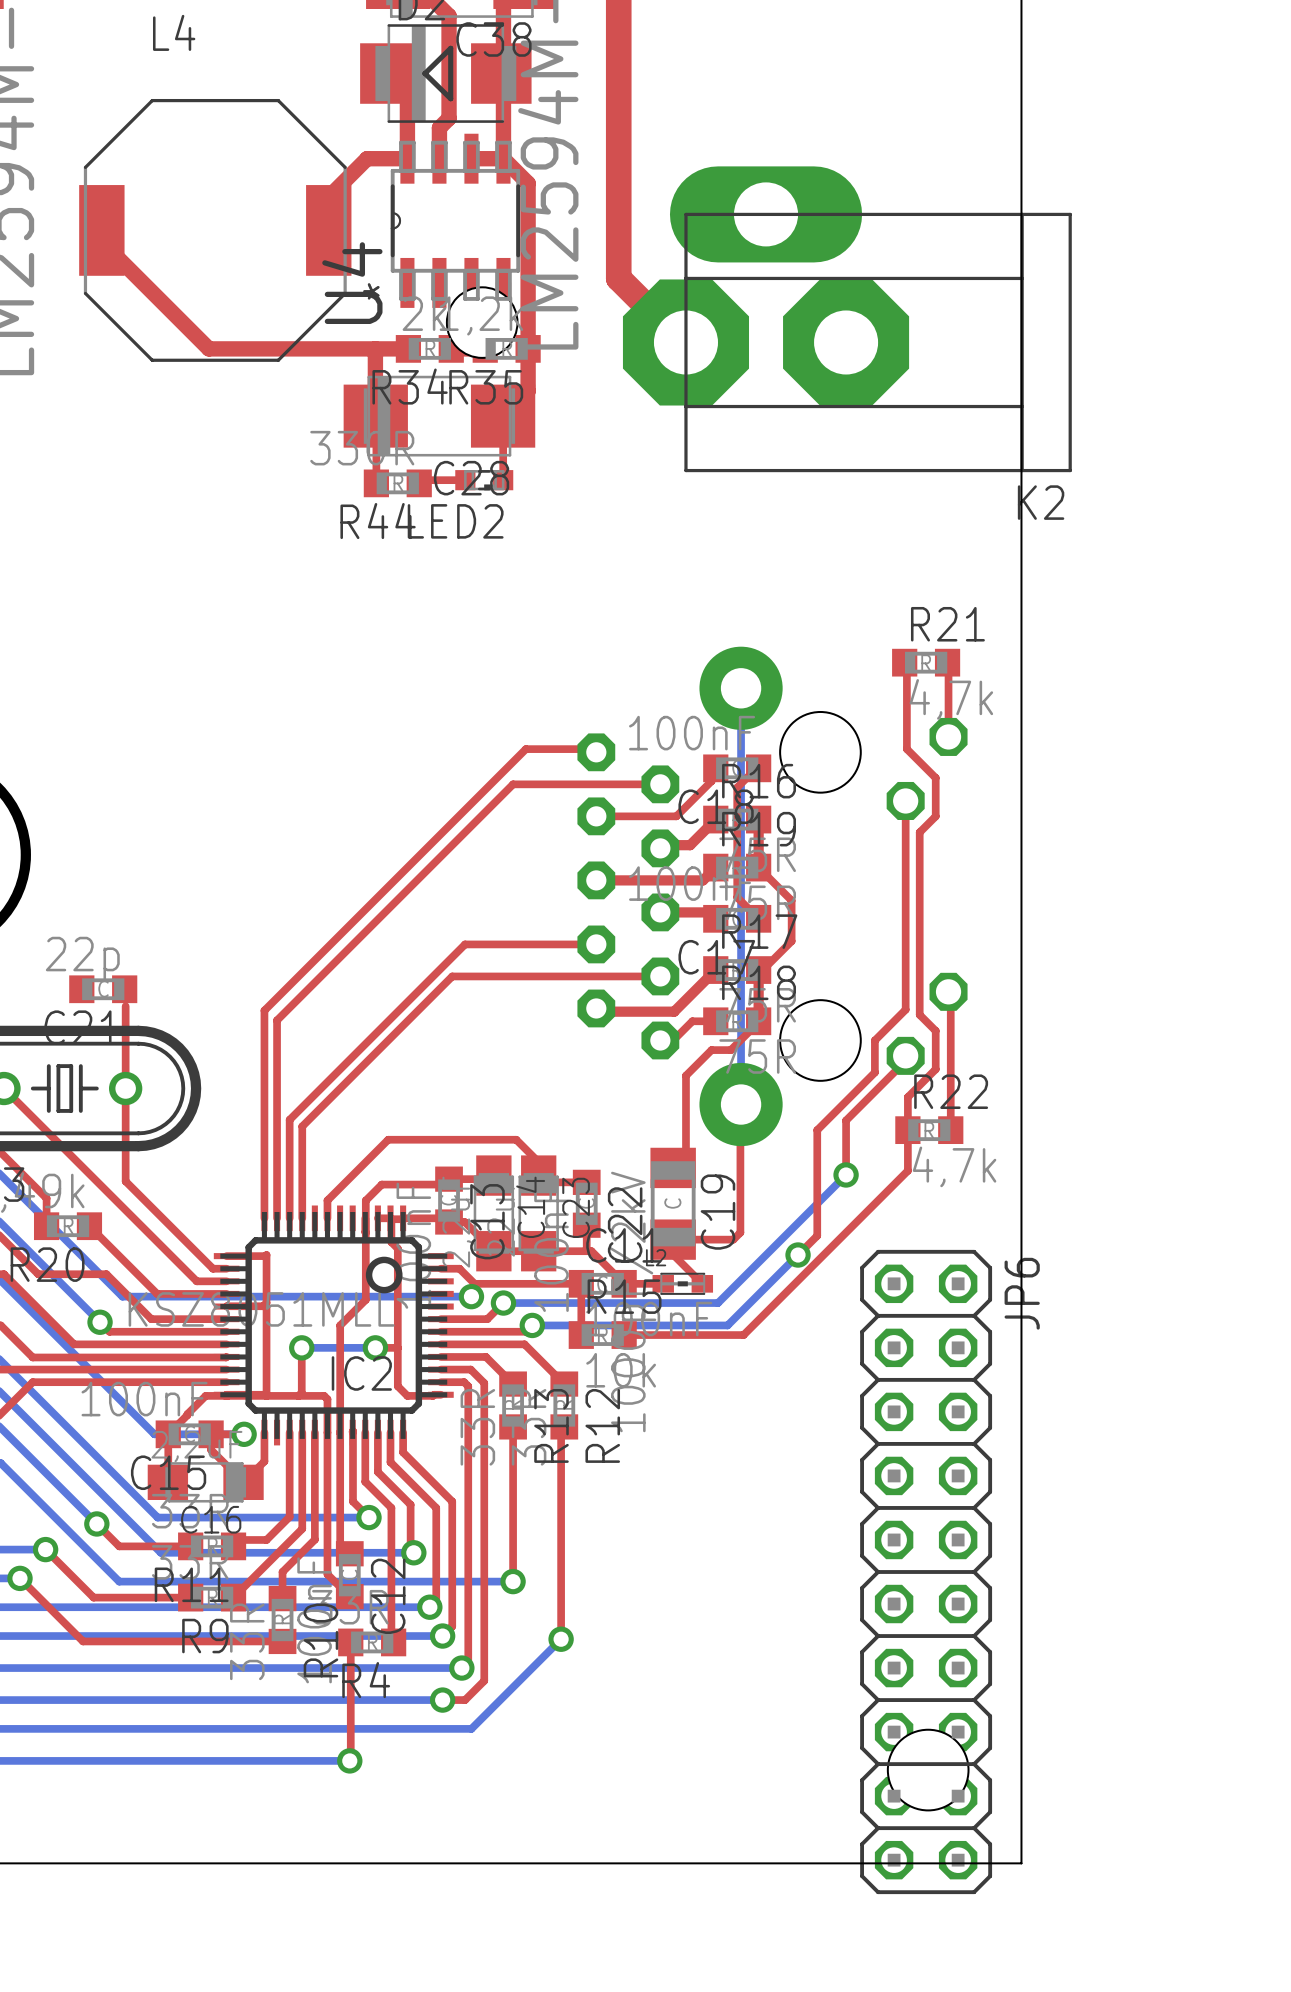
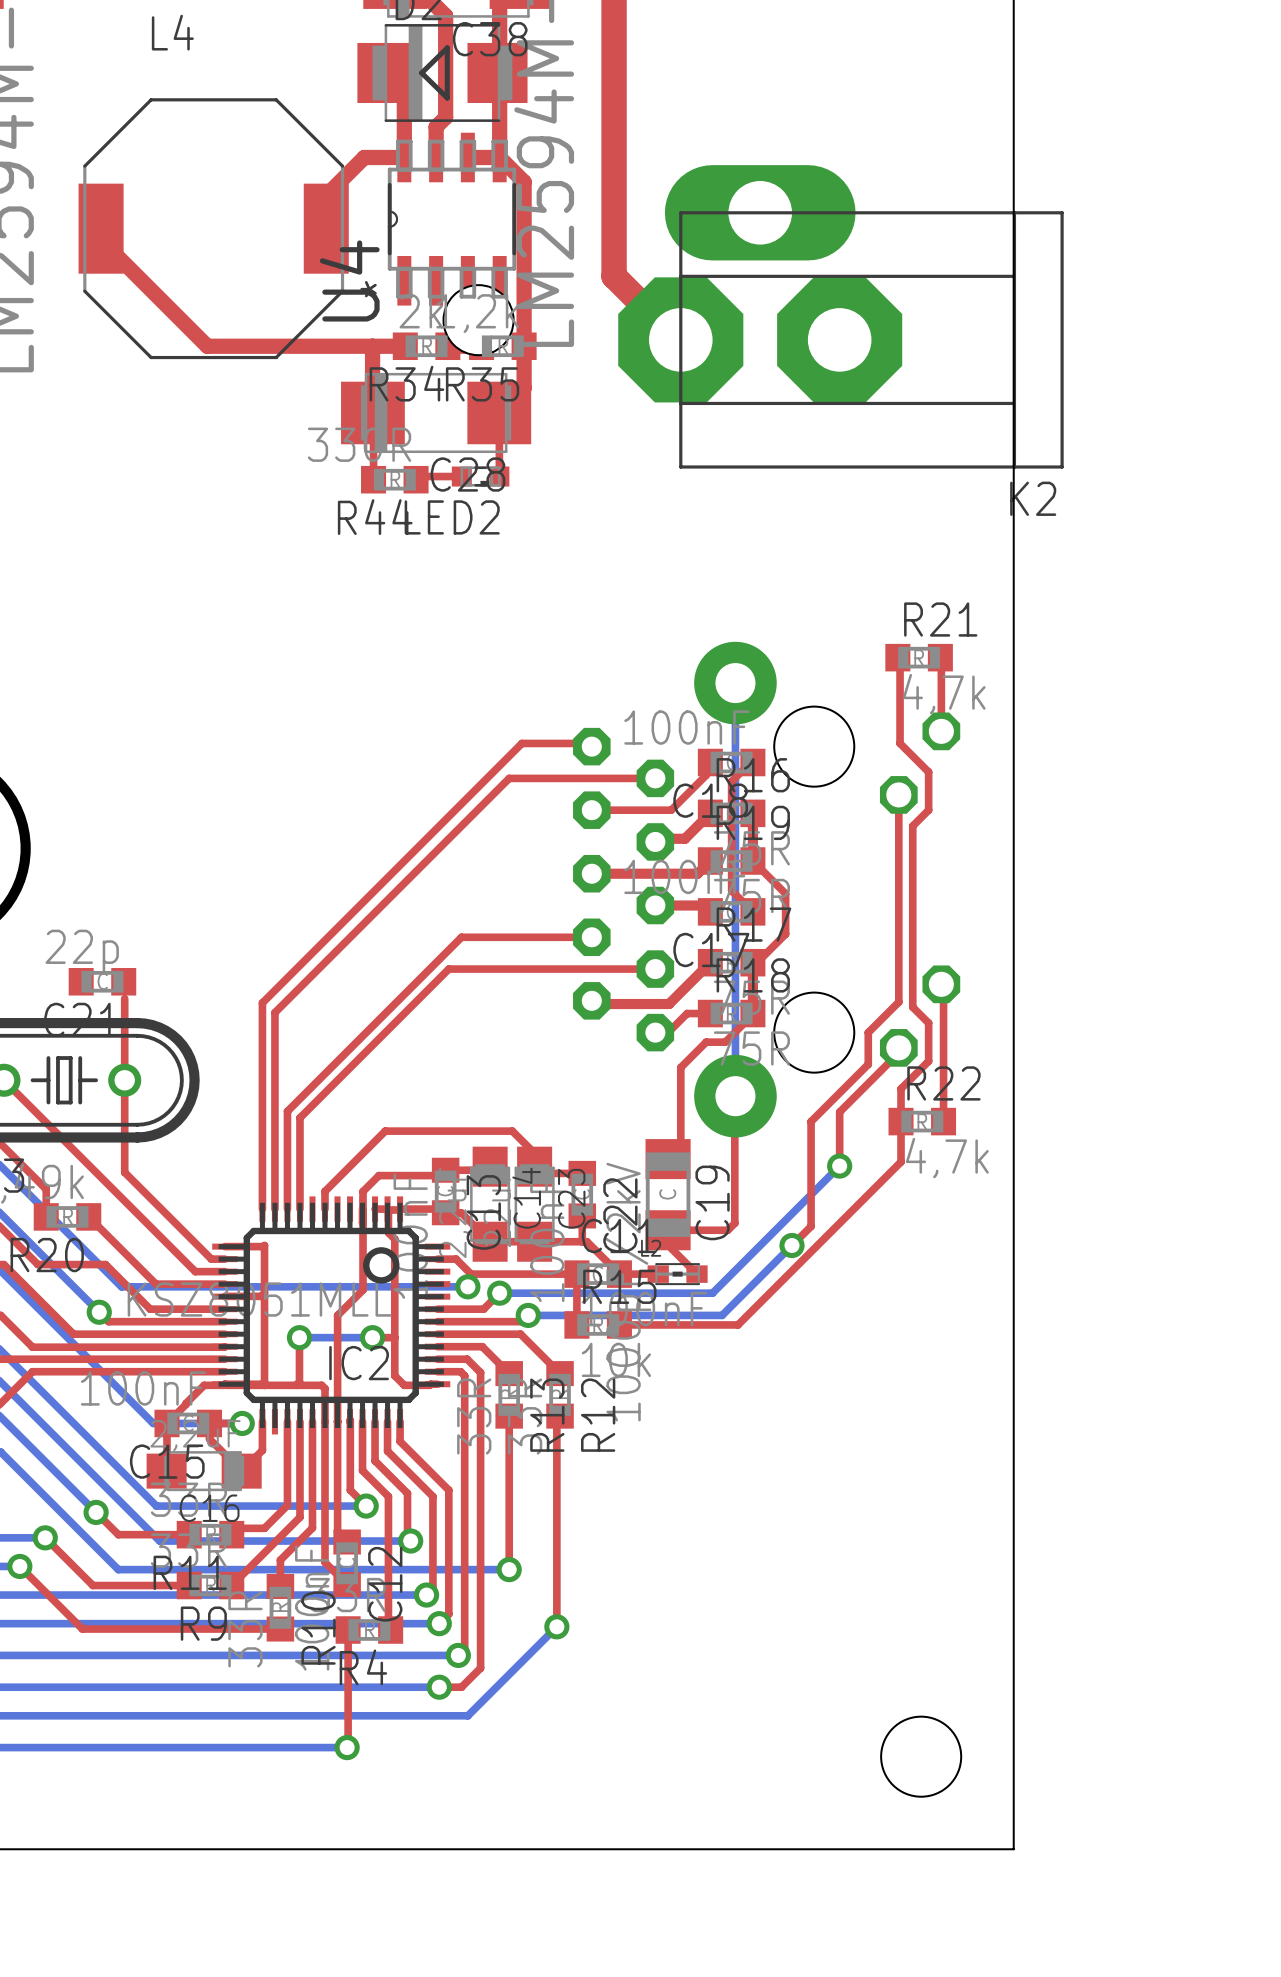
JP6: (926, 1571) -> none

